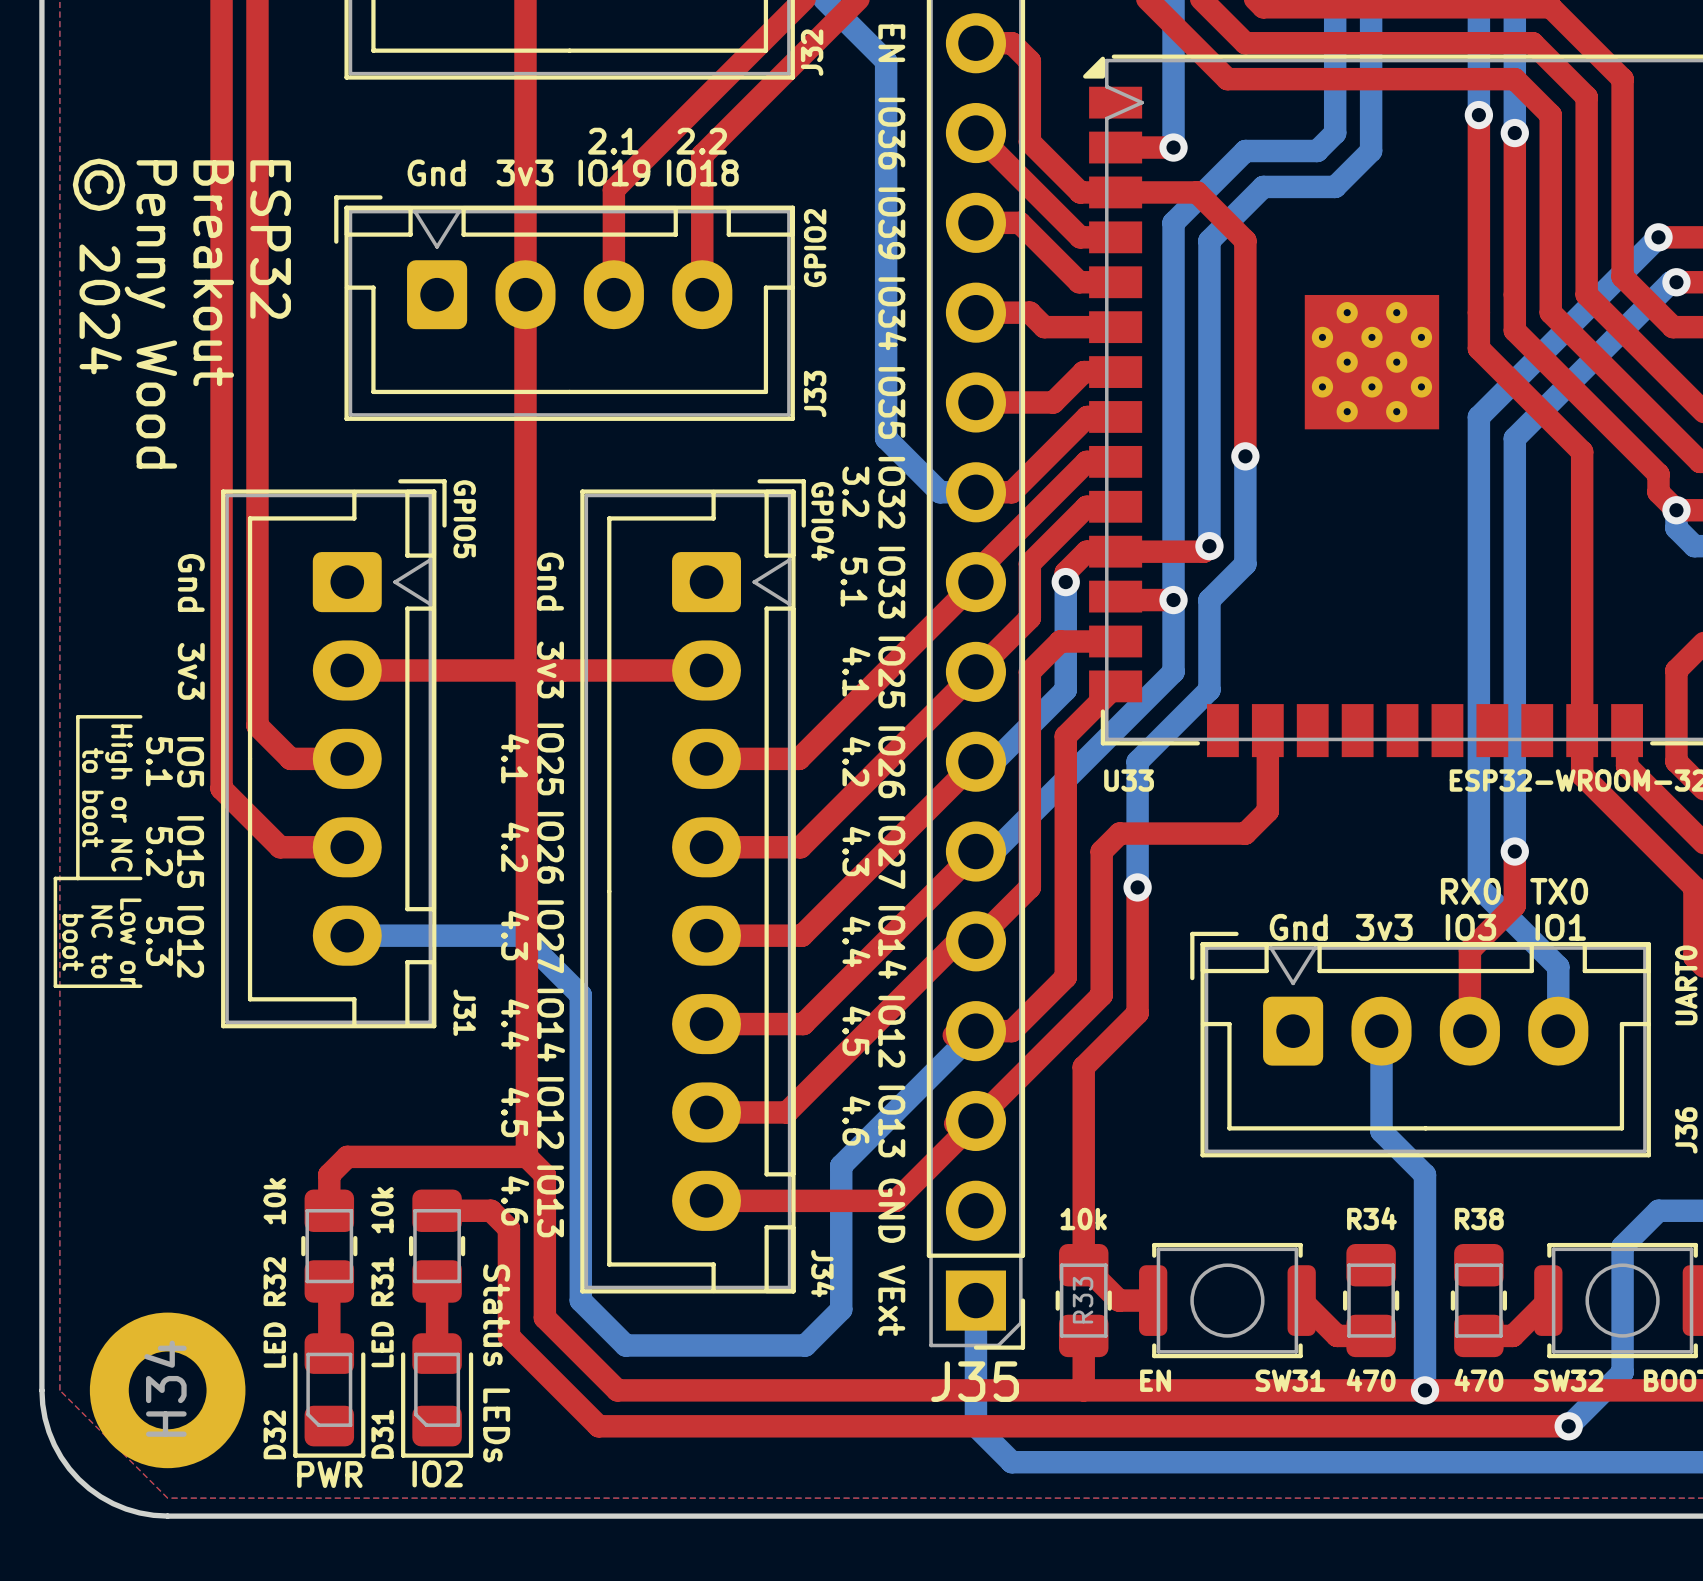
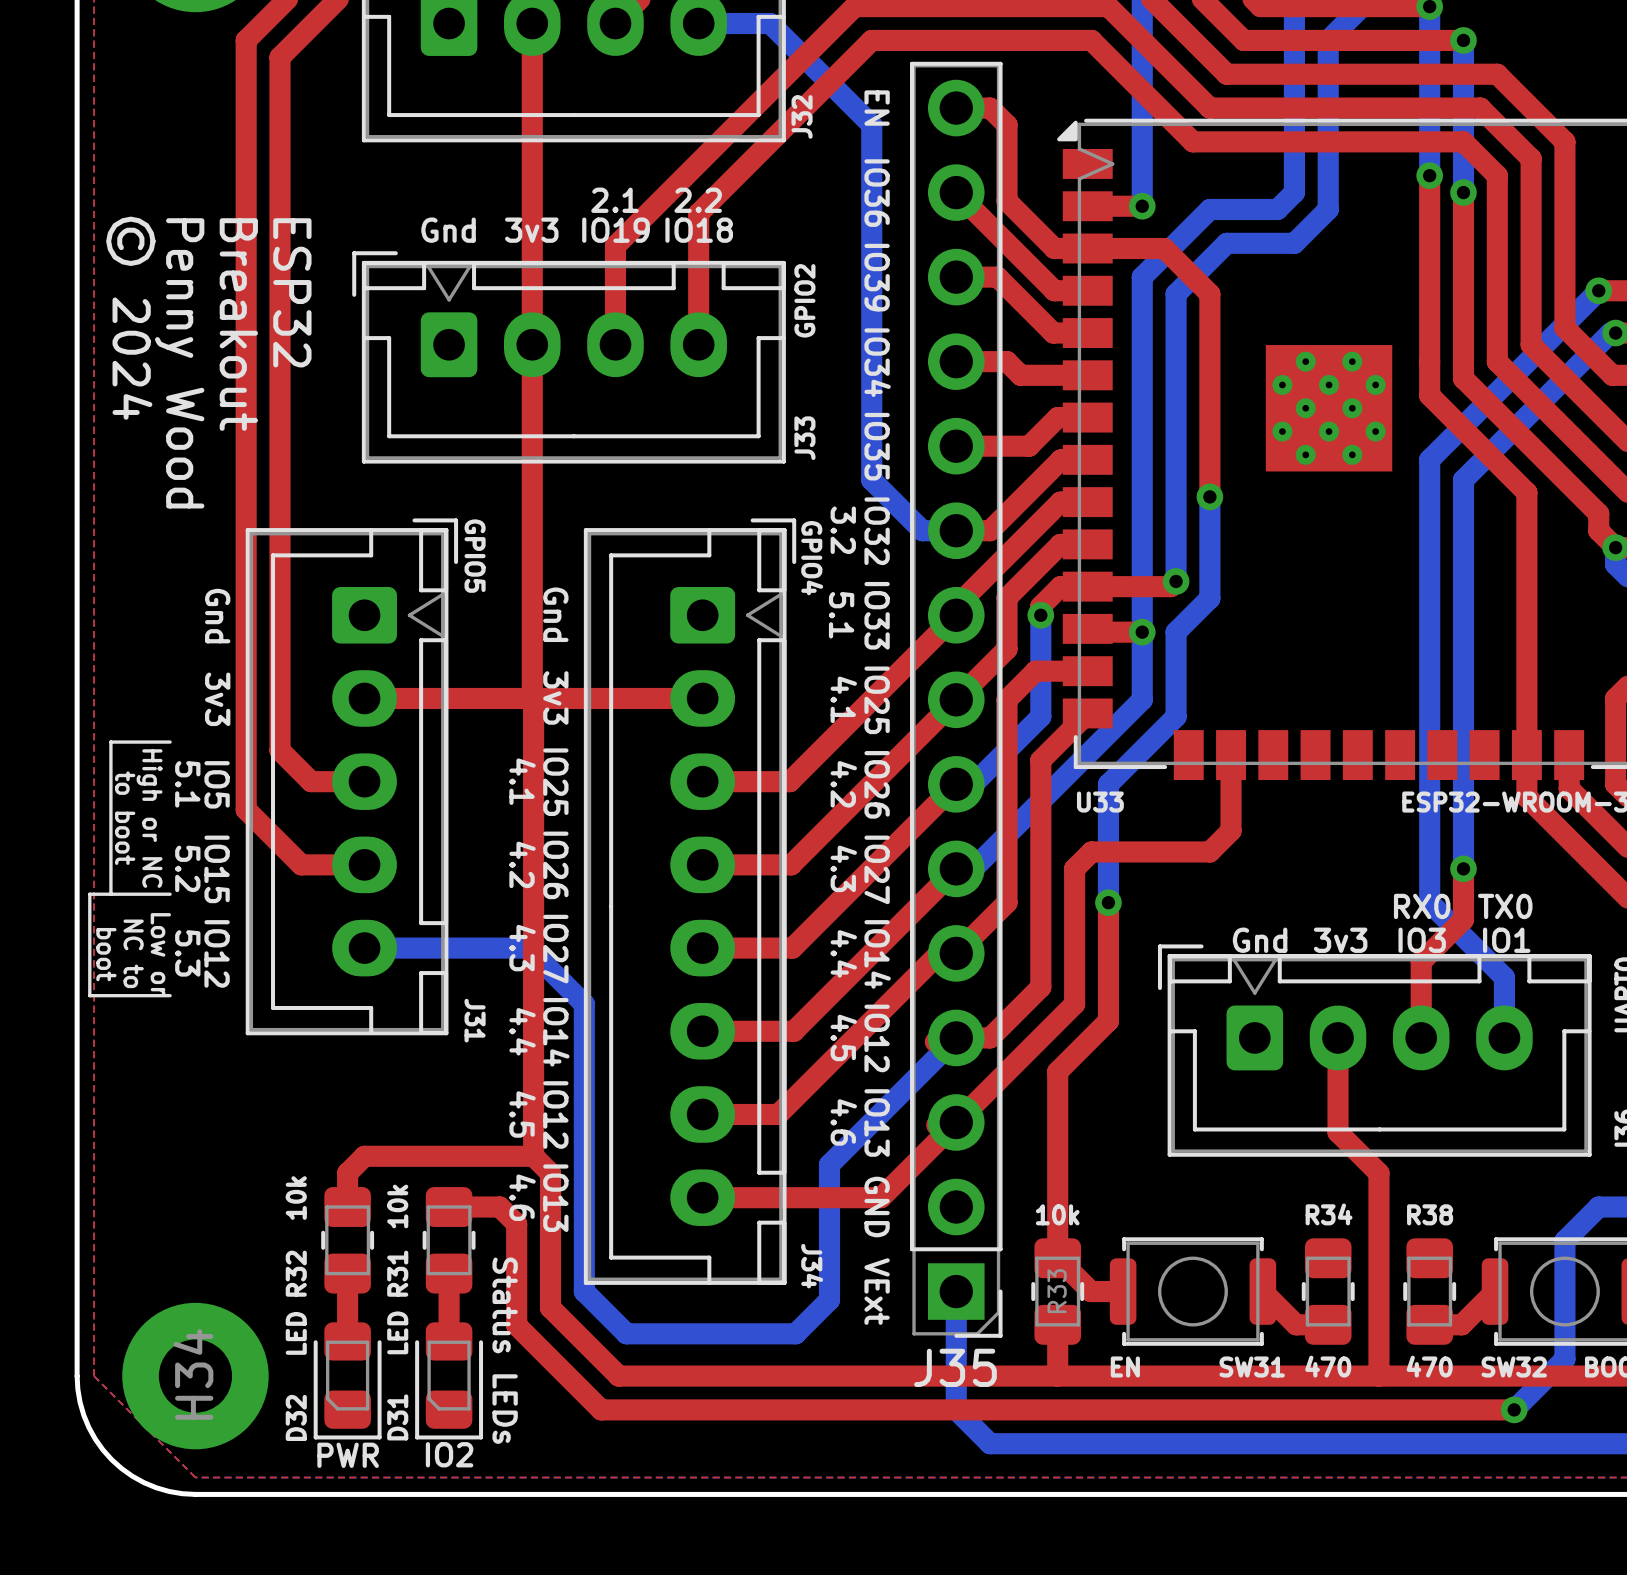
top track: none -> (1338, 1037) (1338, 1132) (1378, 1173) (1378, 1376)
bottom track: (1381, 1031) (1381, 1131) (1425, 1174) (1425, 1390) -> none
via: (1425, 1390) -> none

